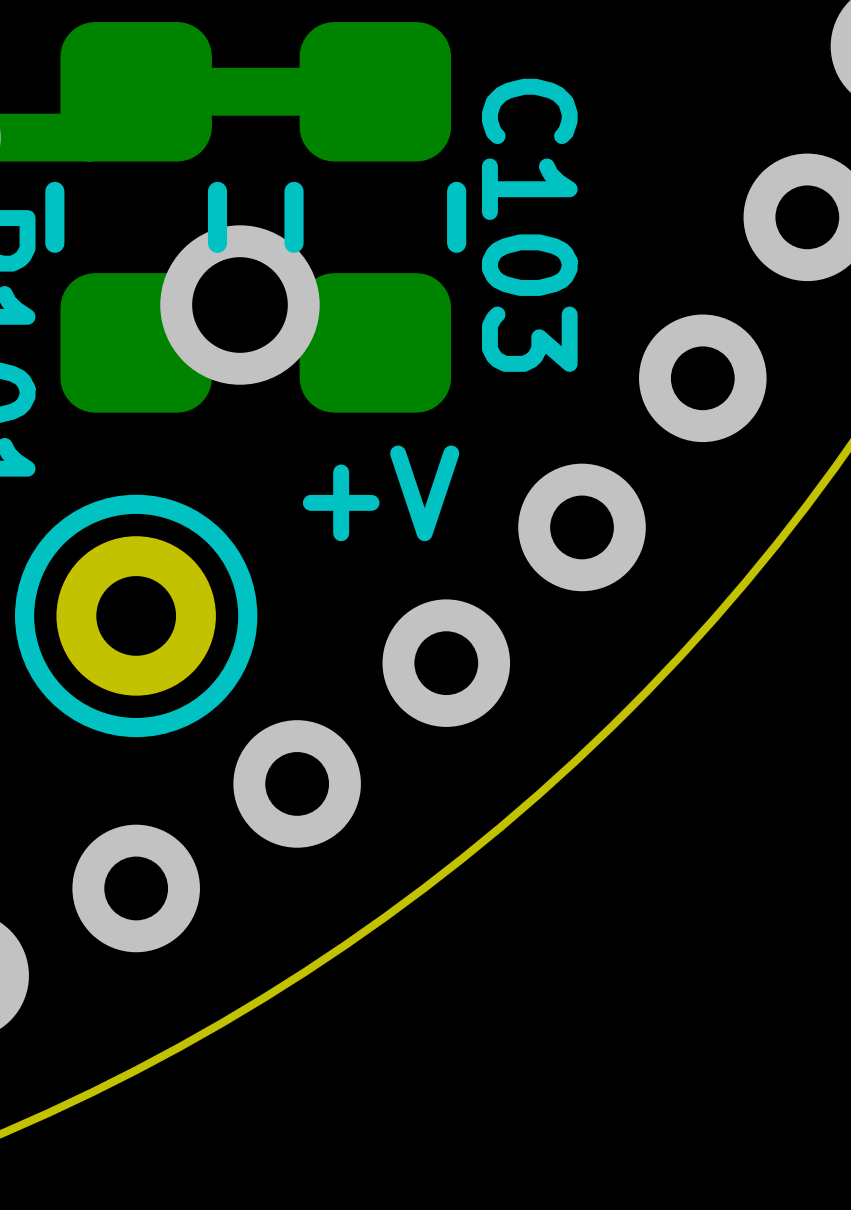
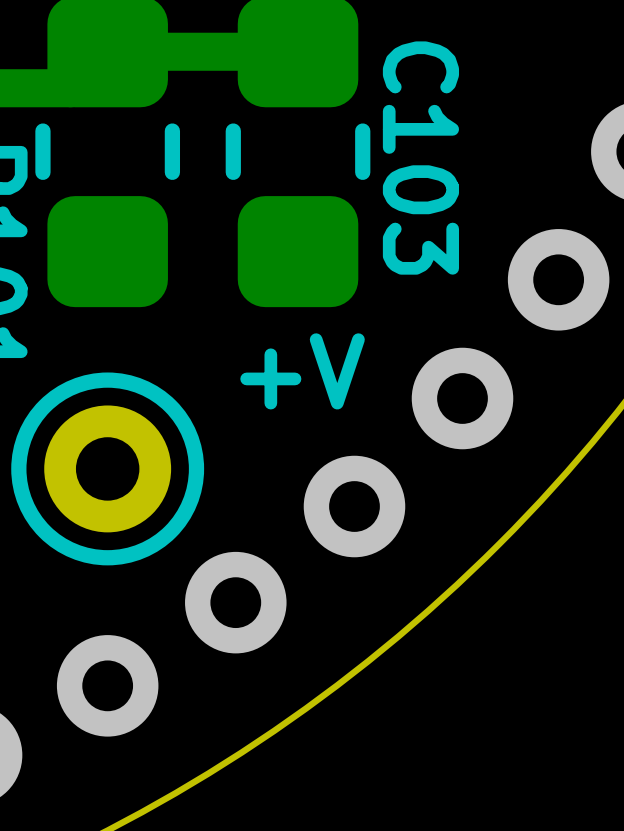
via: (239, 305) -> none

